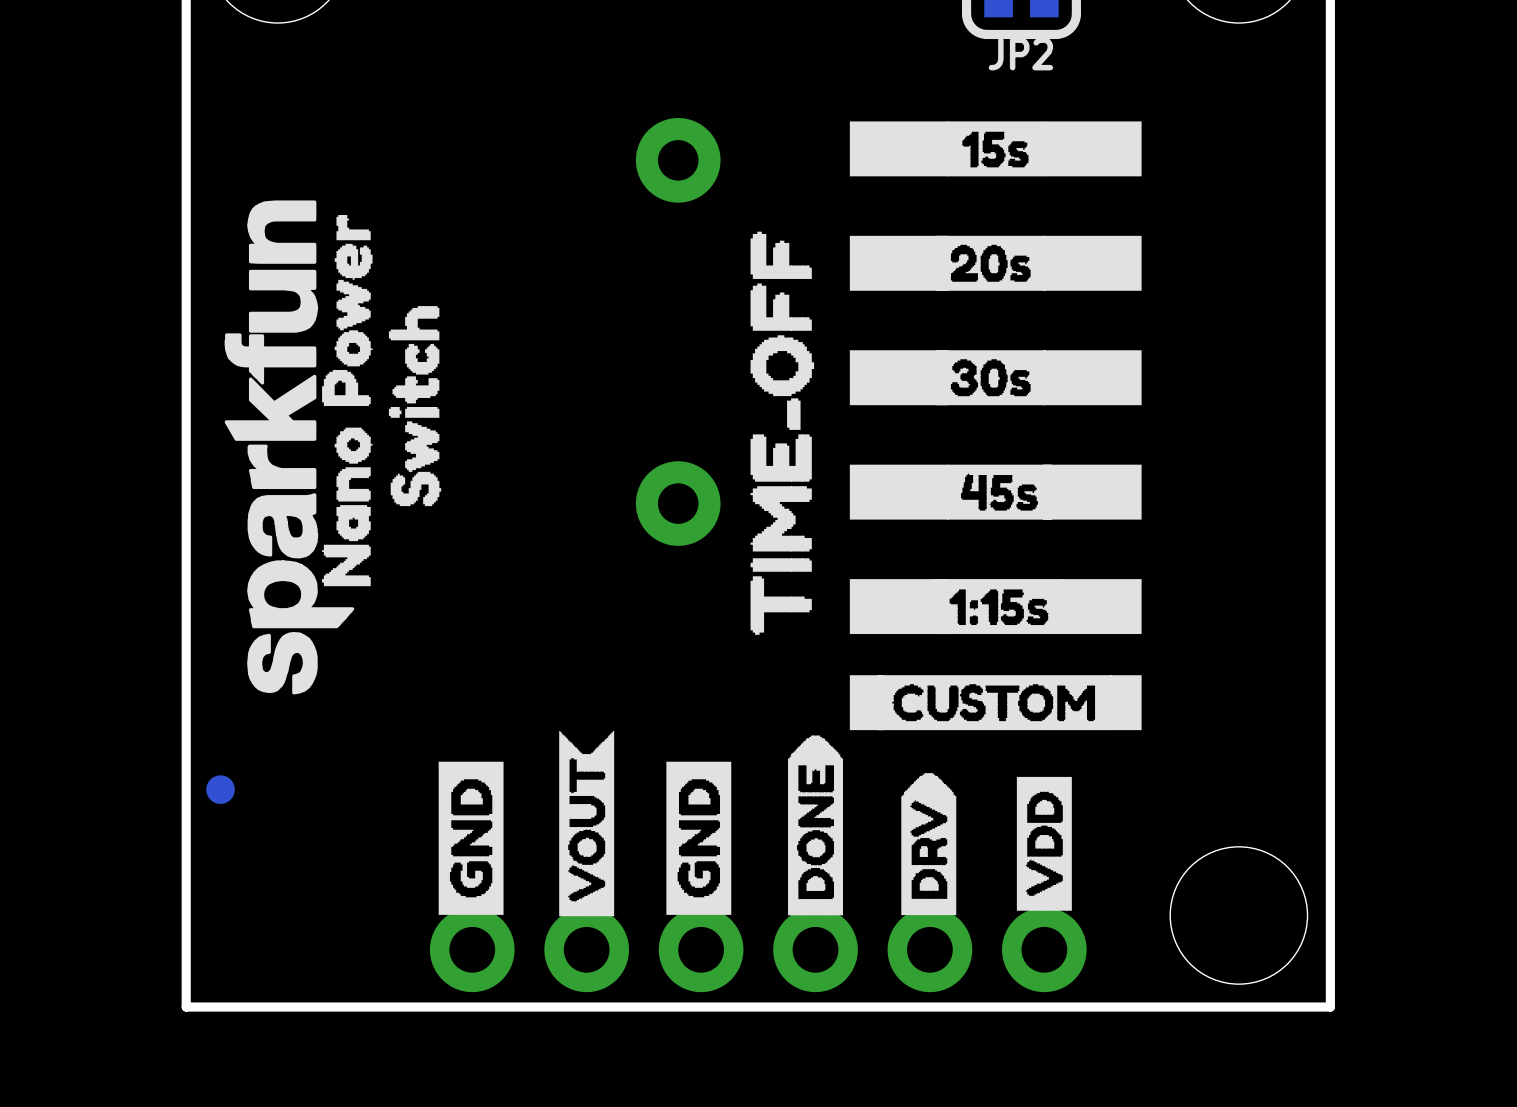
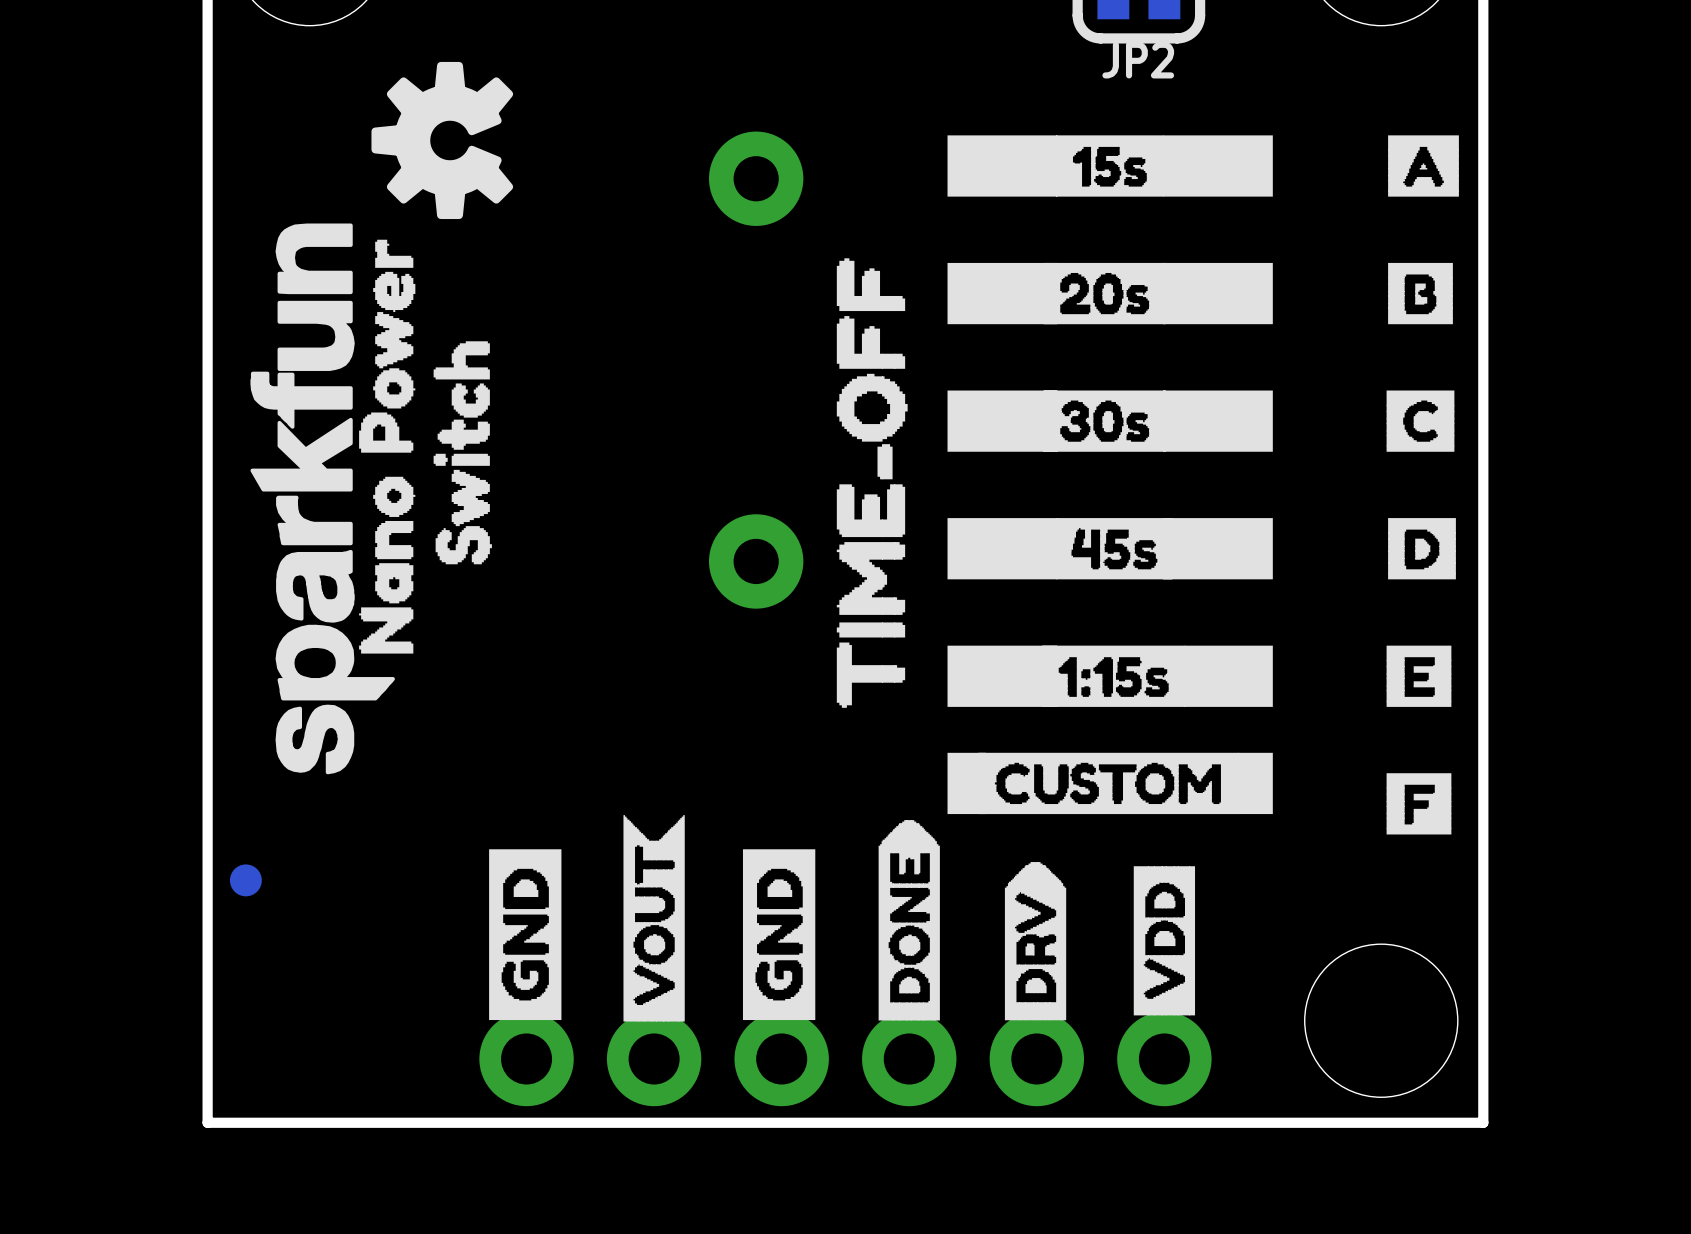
drawing: none -> [371, 61, 514, 220]
drawing: none -> [1388, 135, 1459, 197]
drawing: none -> [1388, 262, 1453, 325]
drawing: none -> [1386, 390, 1455, 452]
drawing: none -> [1388, 518, 1456, 580]
drawing: none -> [1386, 645, 1452, 707]
drawing: none -> [1386, 773, 1452, 835]

